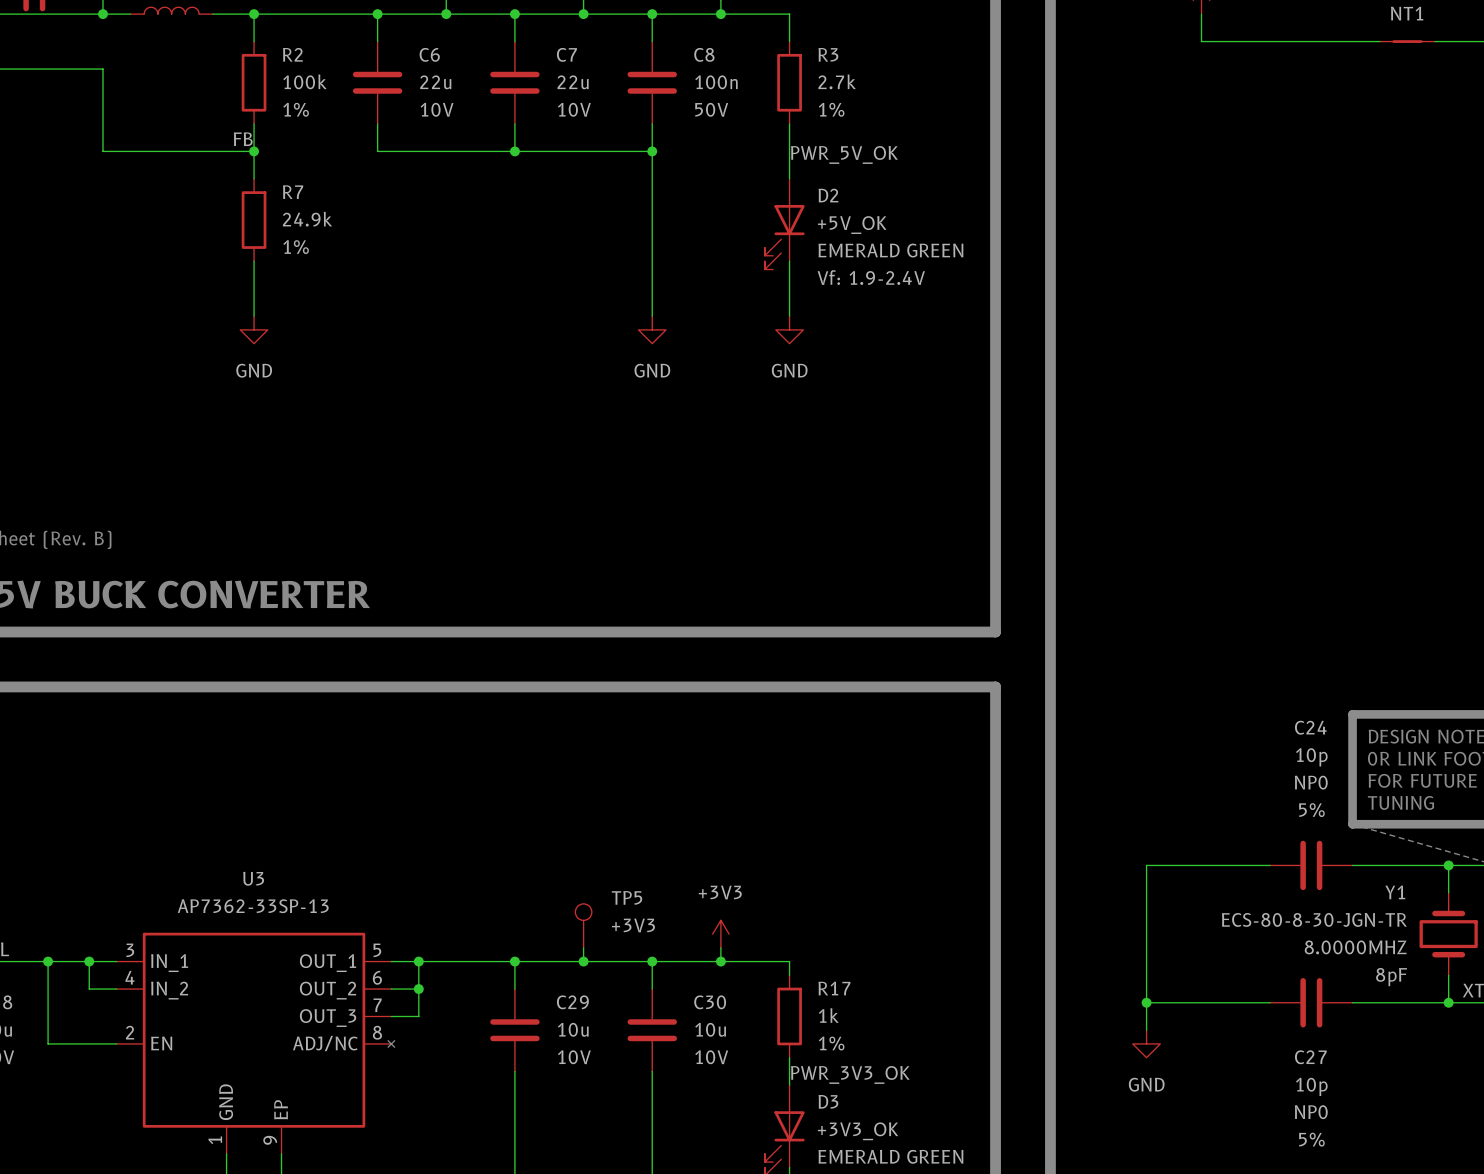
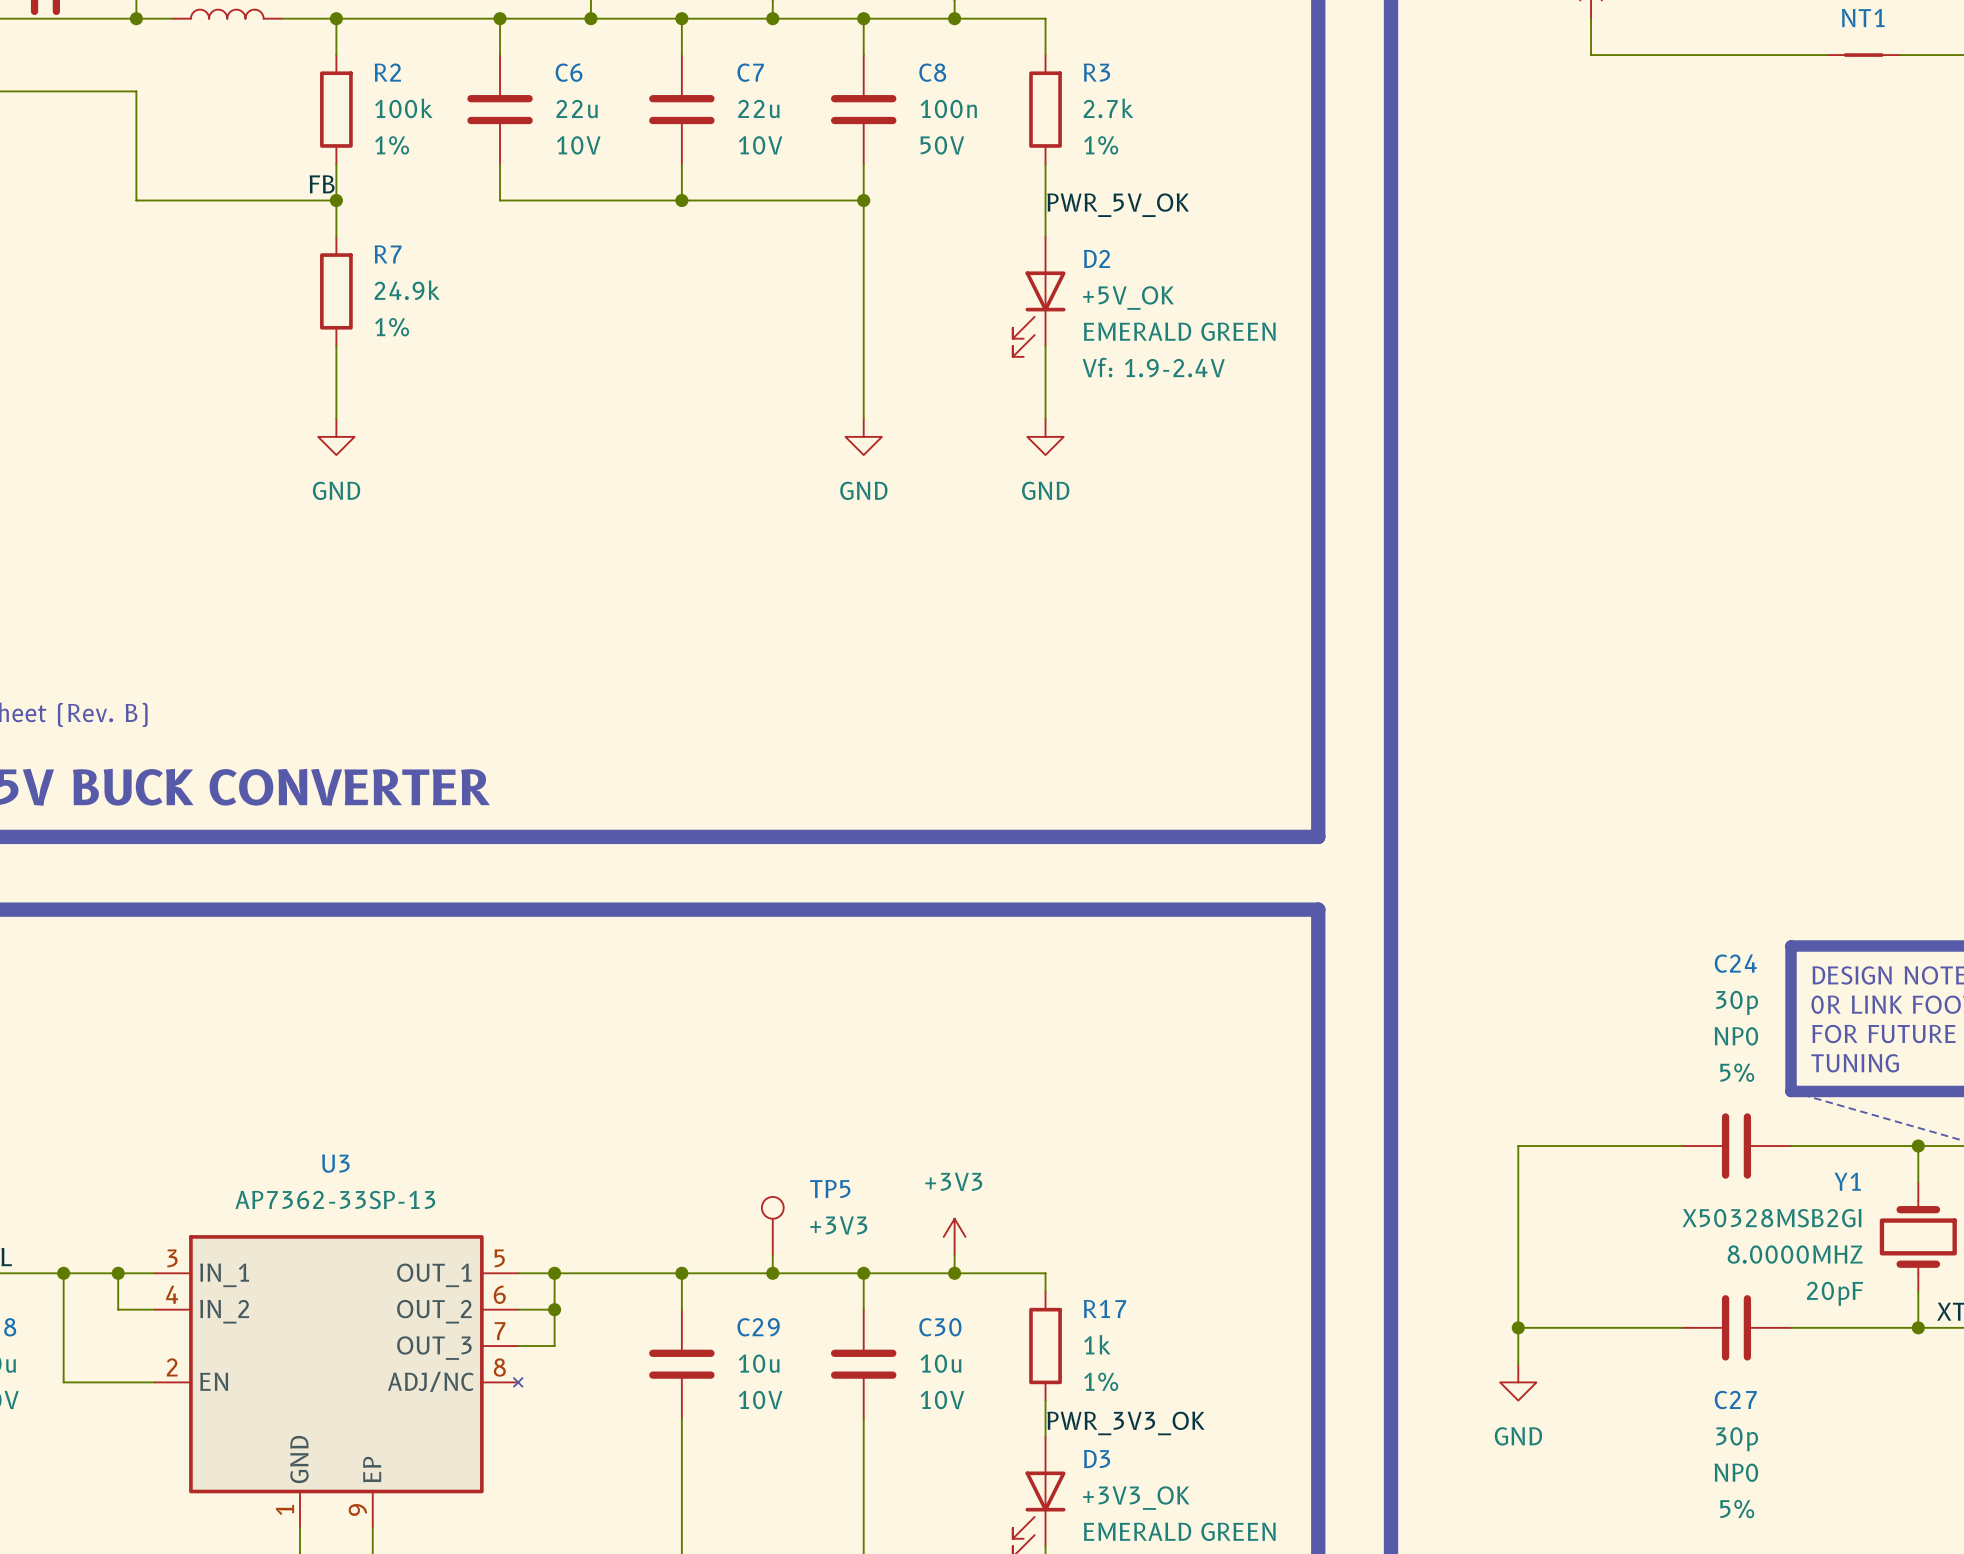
C24 value: 10p (1311, 757) -> 30p (1737, 1002)
Y1 value: ECS-80-8-30-JGN-TR (1314, 919) -> X50328MSB2GI (1771, 1218)
Y1 text: 8pF (1391, 977) -> 20pF (1835, 1293)
C27 value: 10p (1311, 1086) -> 30p (1737, 1439)

